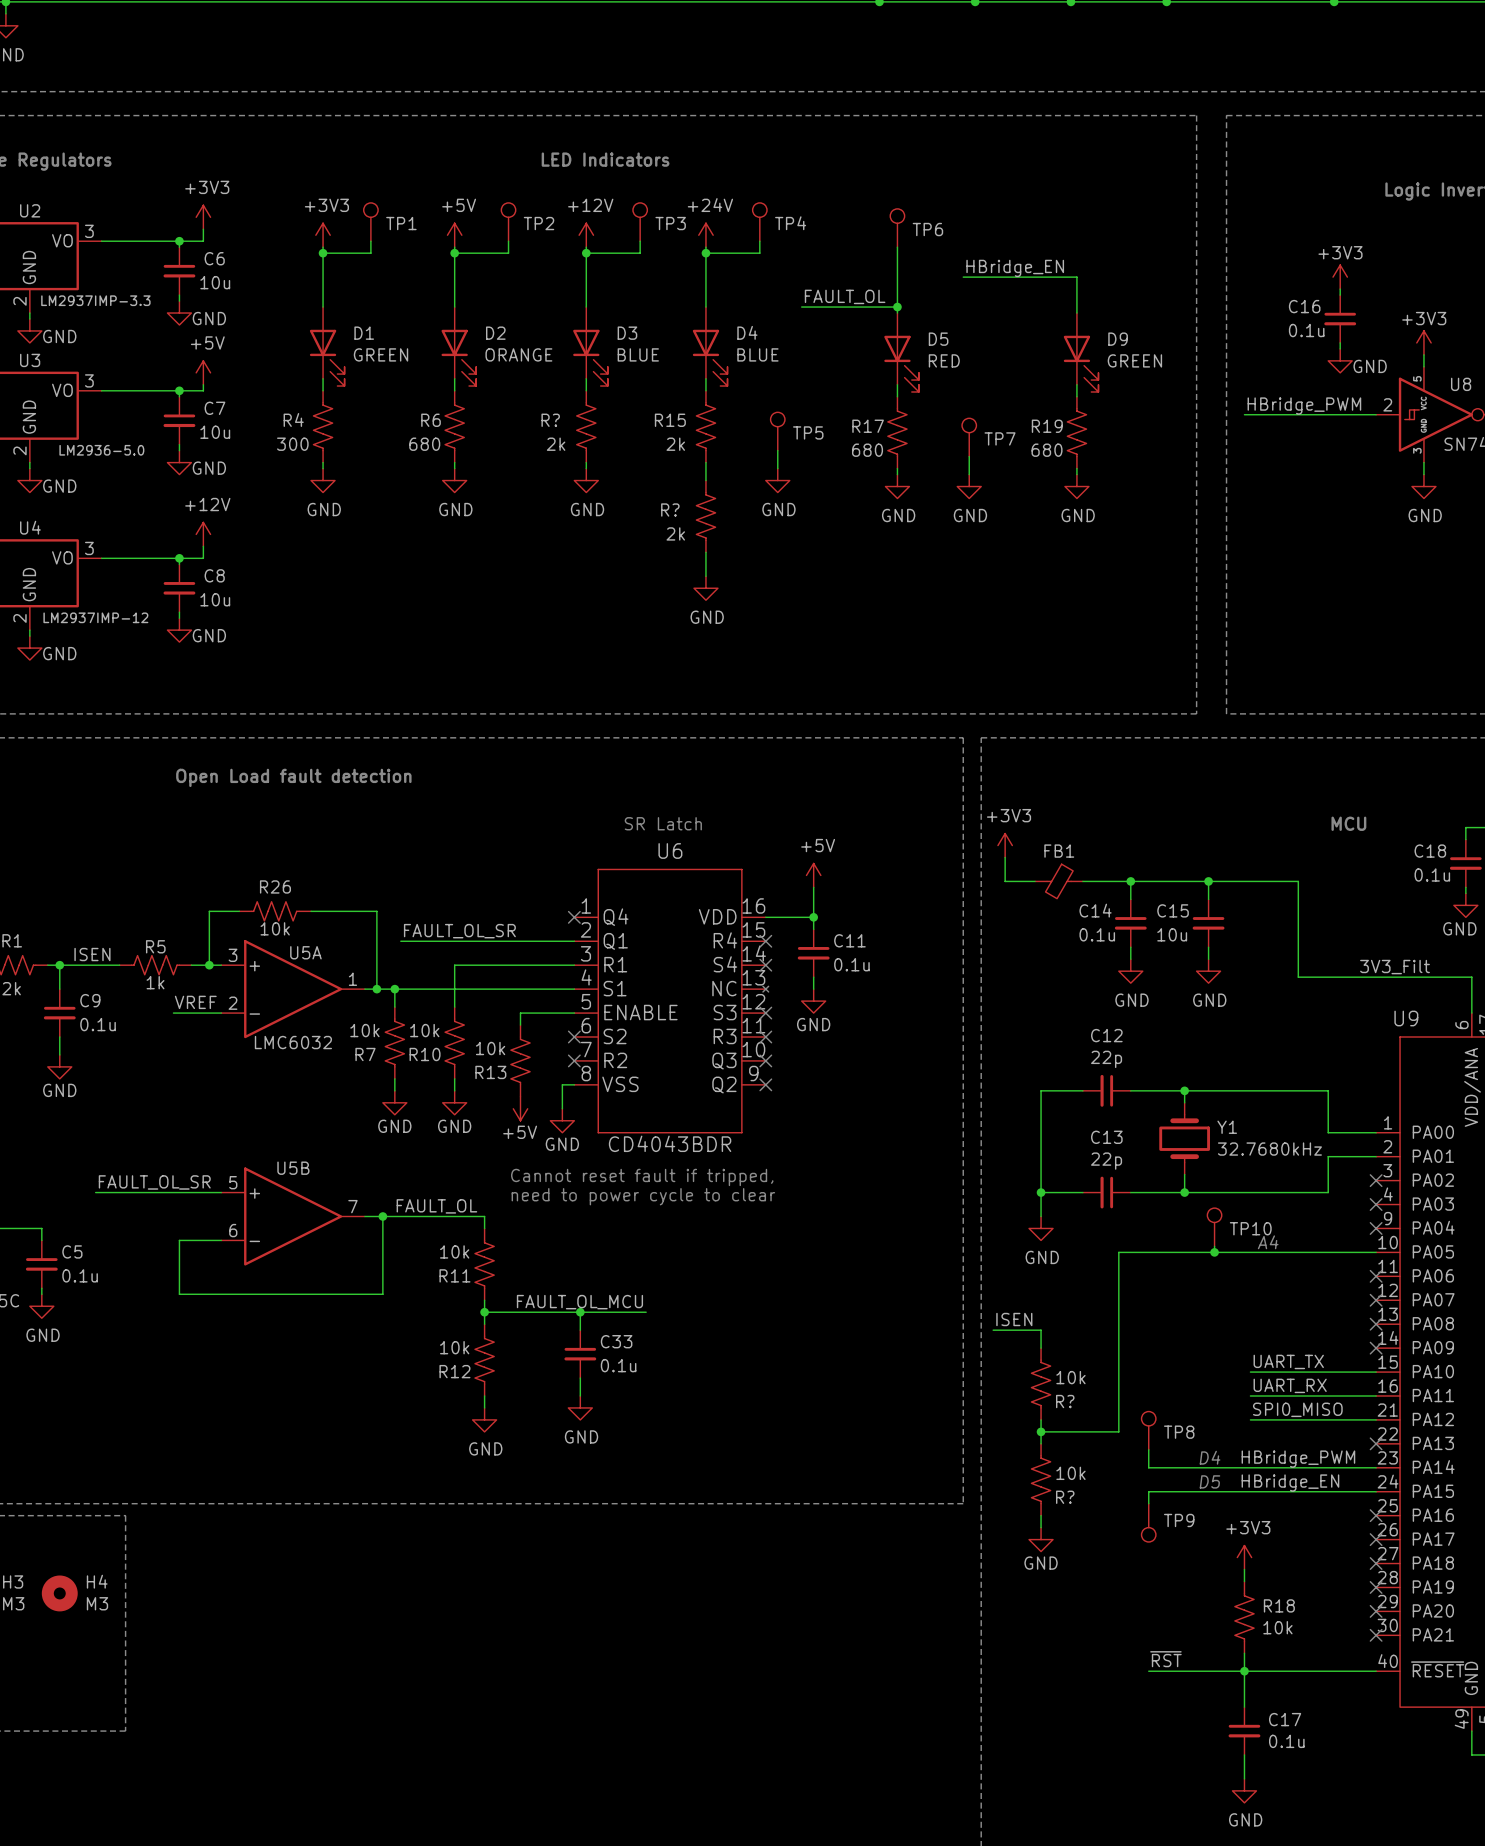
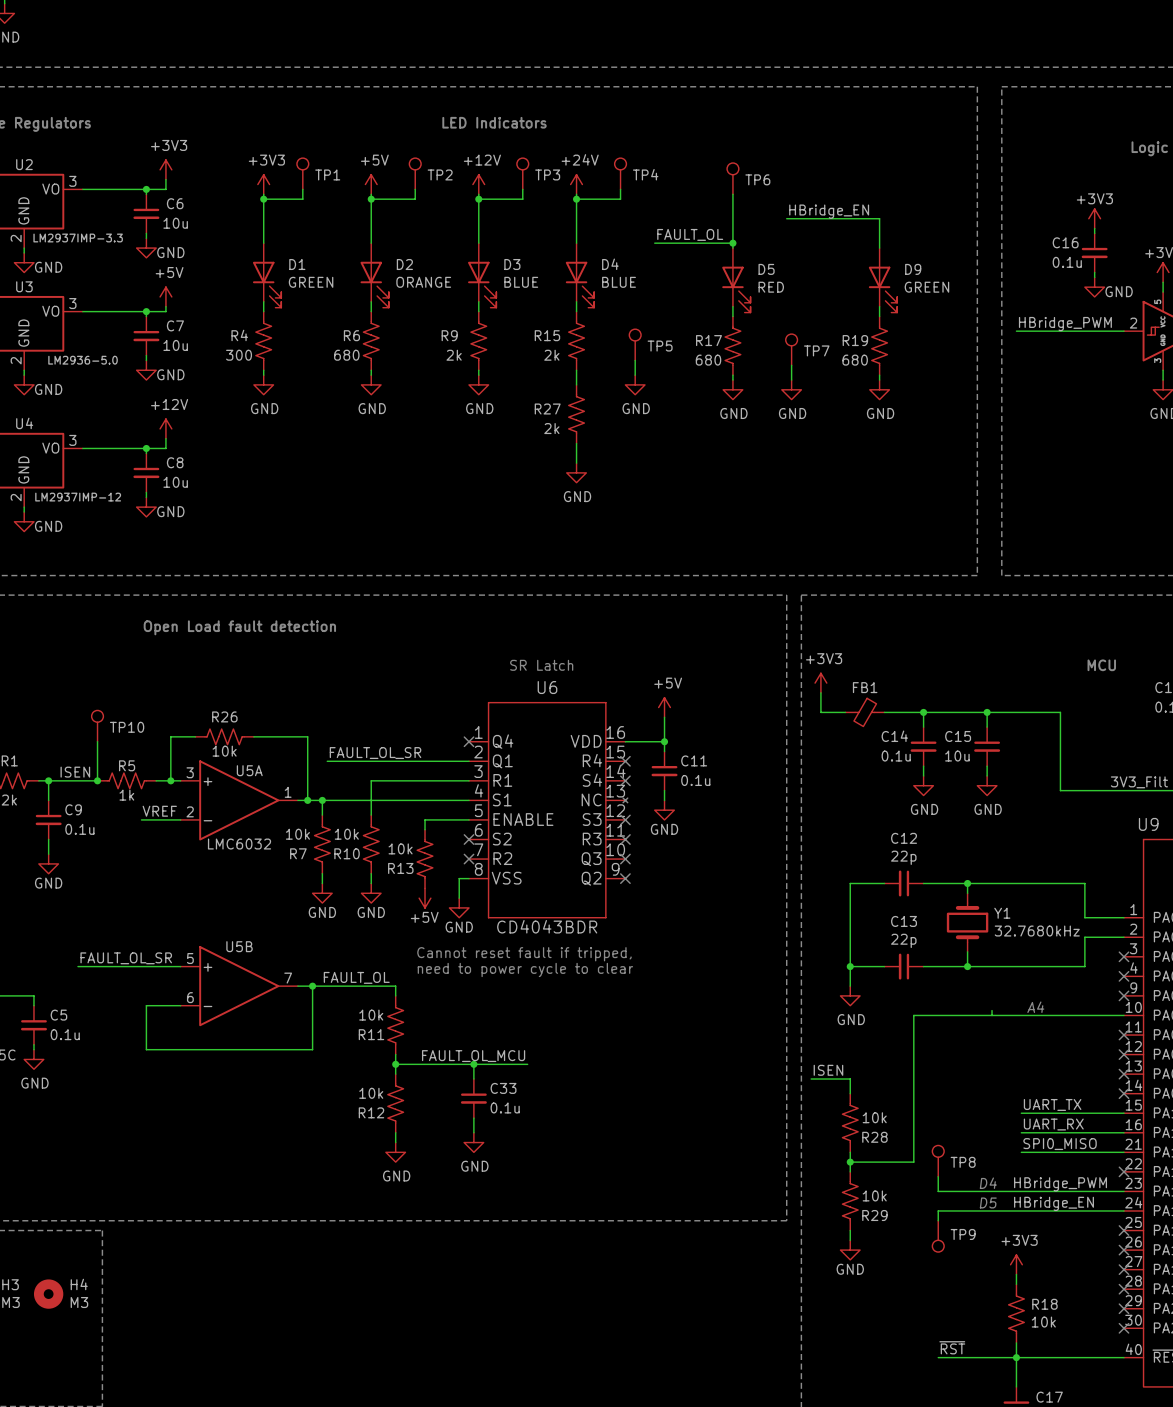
R? name: R? (550, 420) -> R9 (449, 335)
R? name: R? (670, 510) -> R27 (547, 409)
wire: none -> (97, 741) (97, 780)
junction: none -> (97, 780)
TP10 position: (1214, 1227) -> (97, 726)
junction: (1214, 1252) -> none
R? name: R? (1065, 1401) -> R28 (874, 1137)
R? name: R? (1065, 1497) -> R29 (874, 1215)

